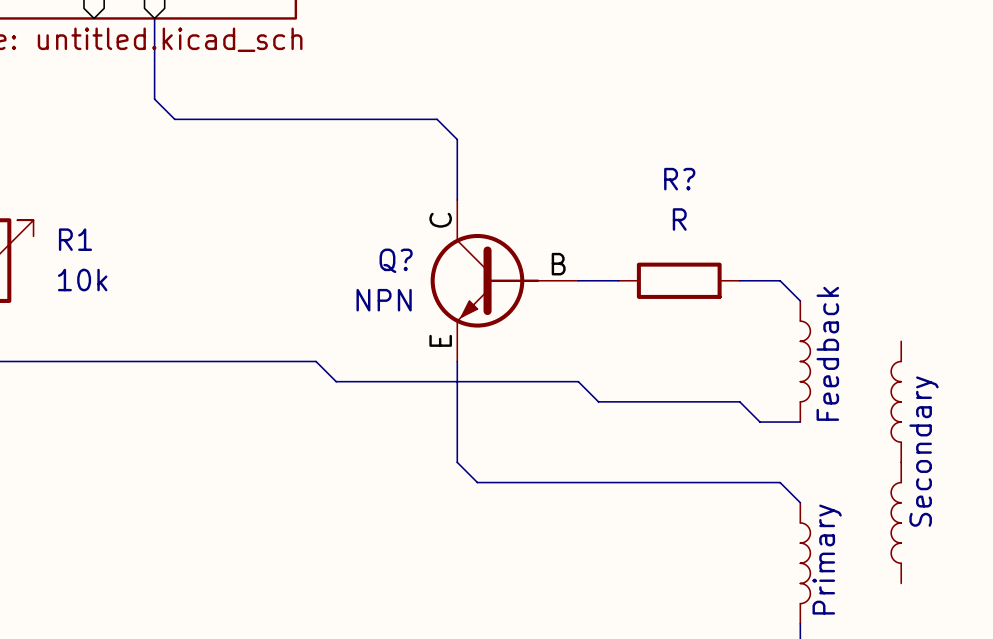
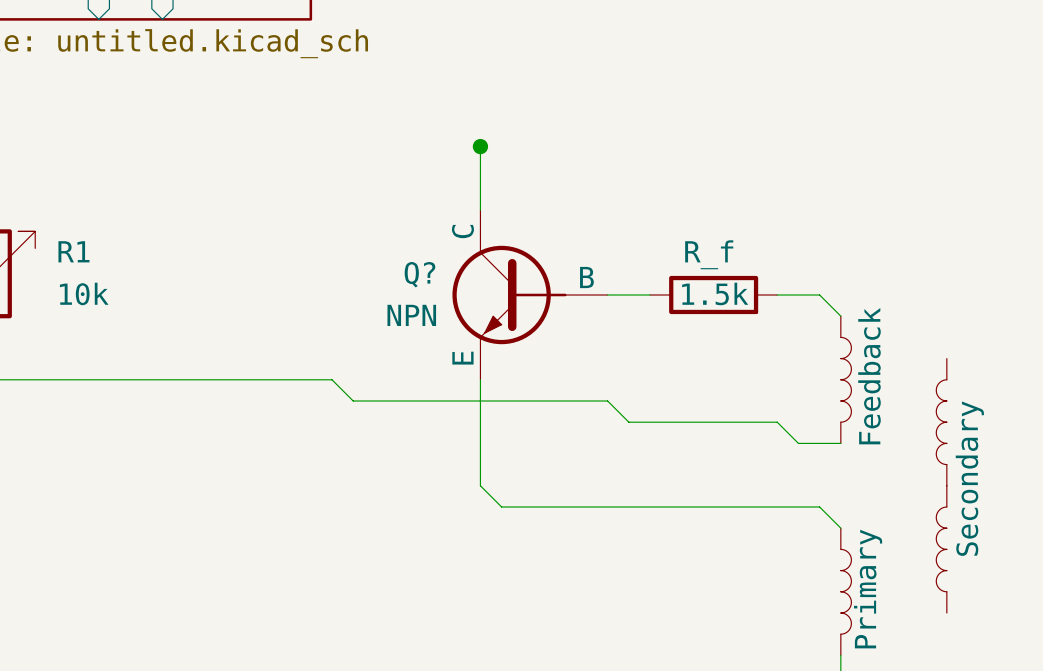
wire: (154, 18) (154, 99) (174, 119) (437, 119) (457, 139) -> none
junction: none -> (480, 146)
R? name: R? (679, 179) -> R_f (709, 254)
R? value: R (679, 219) -> 1.5k (715, 293)

